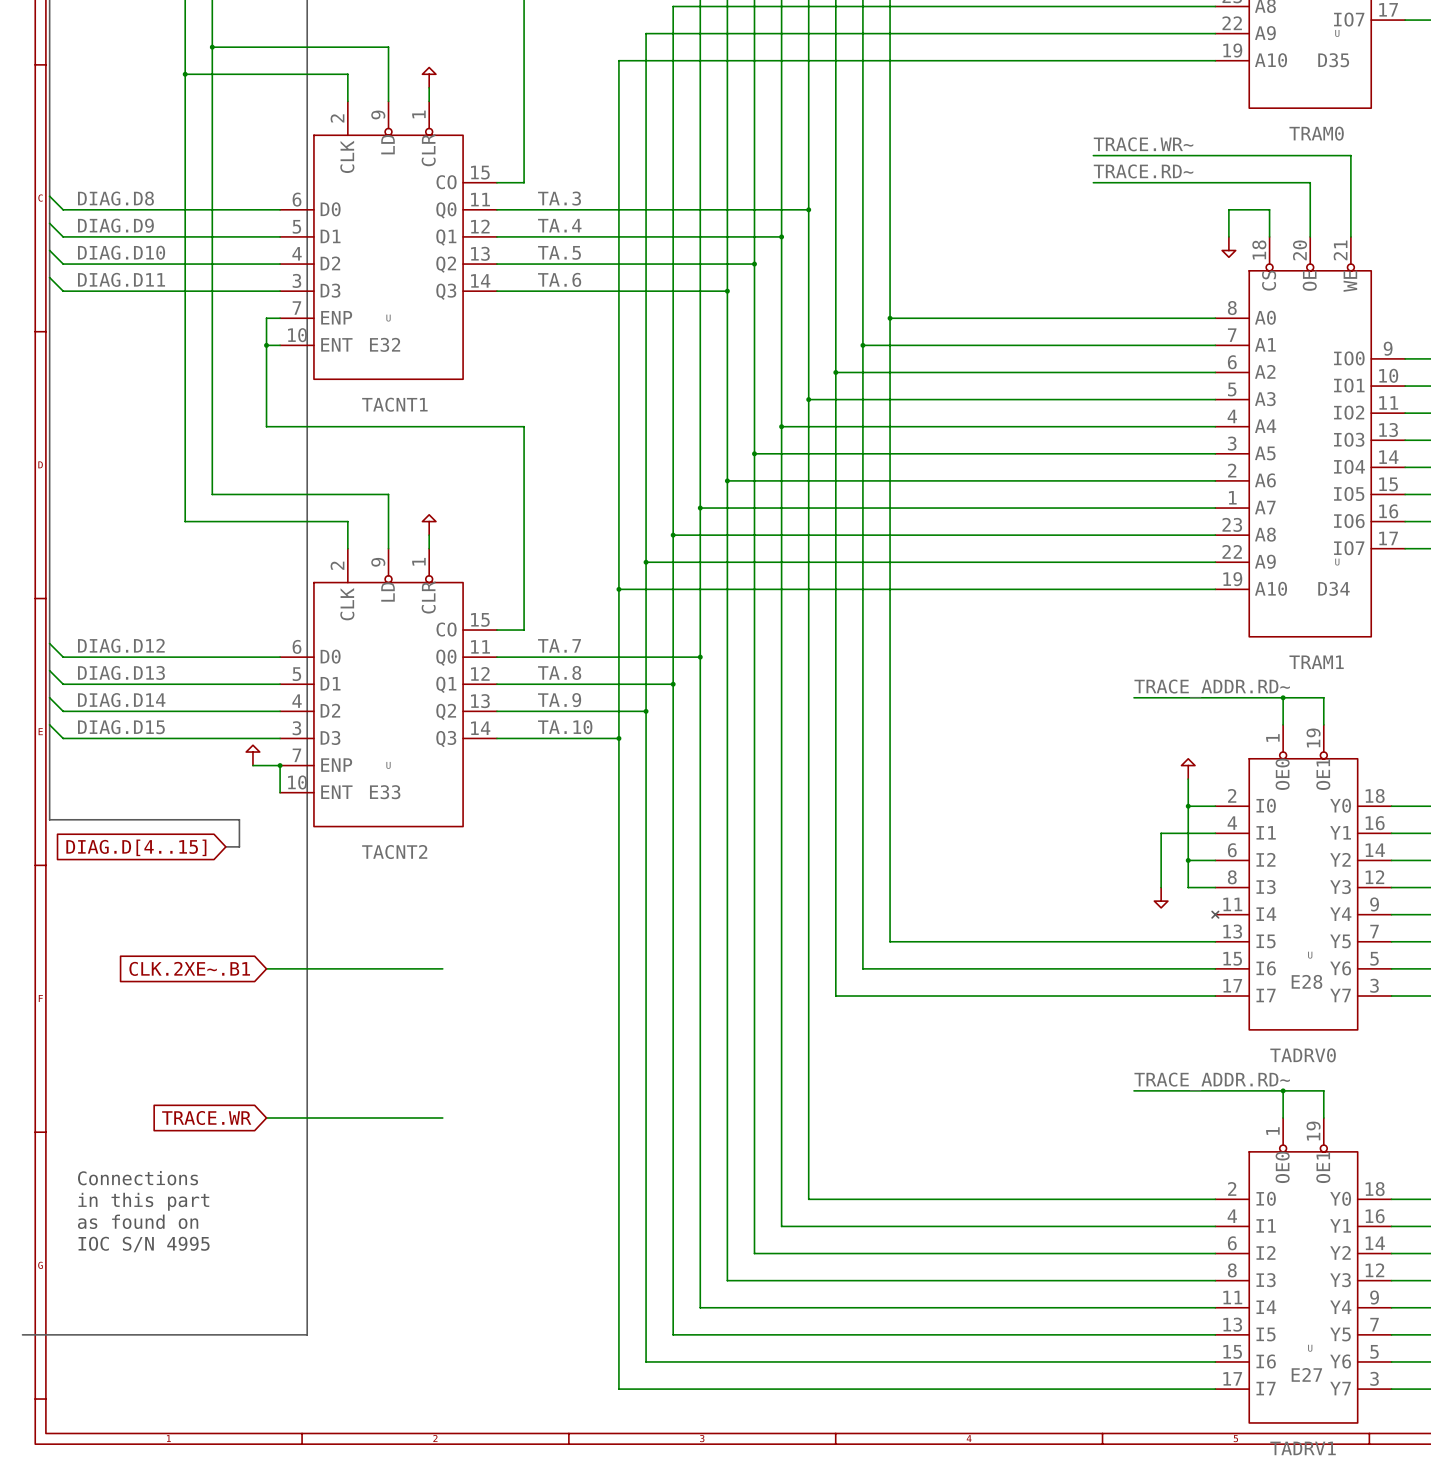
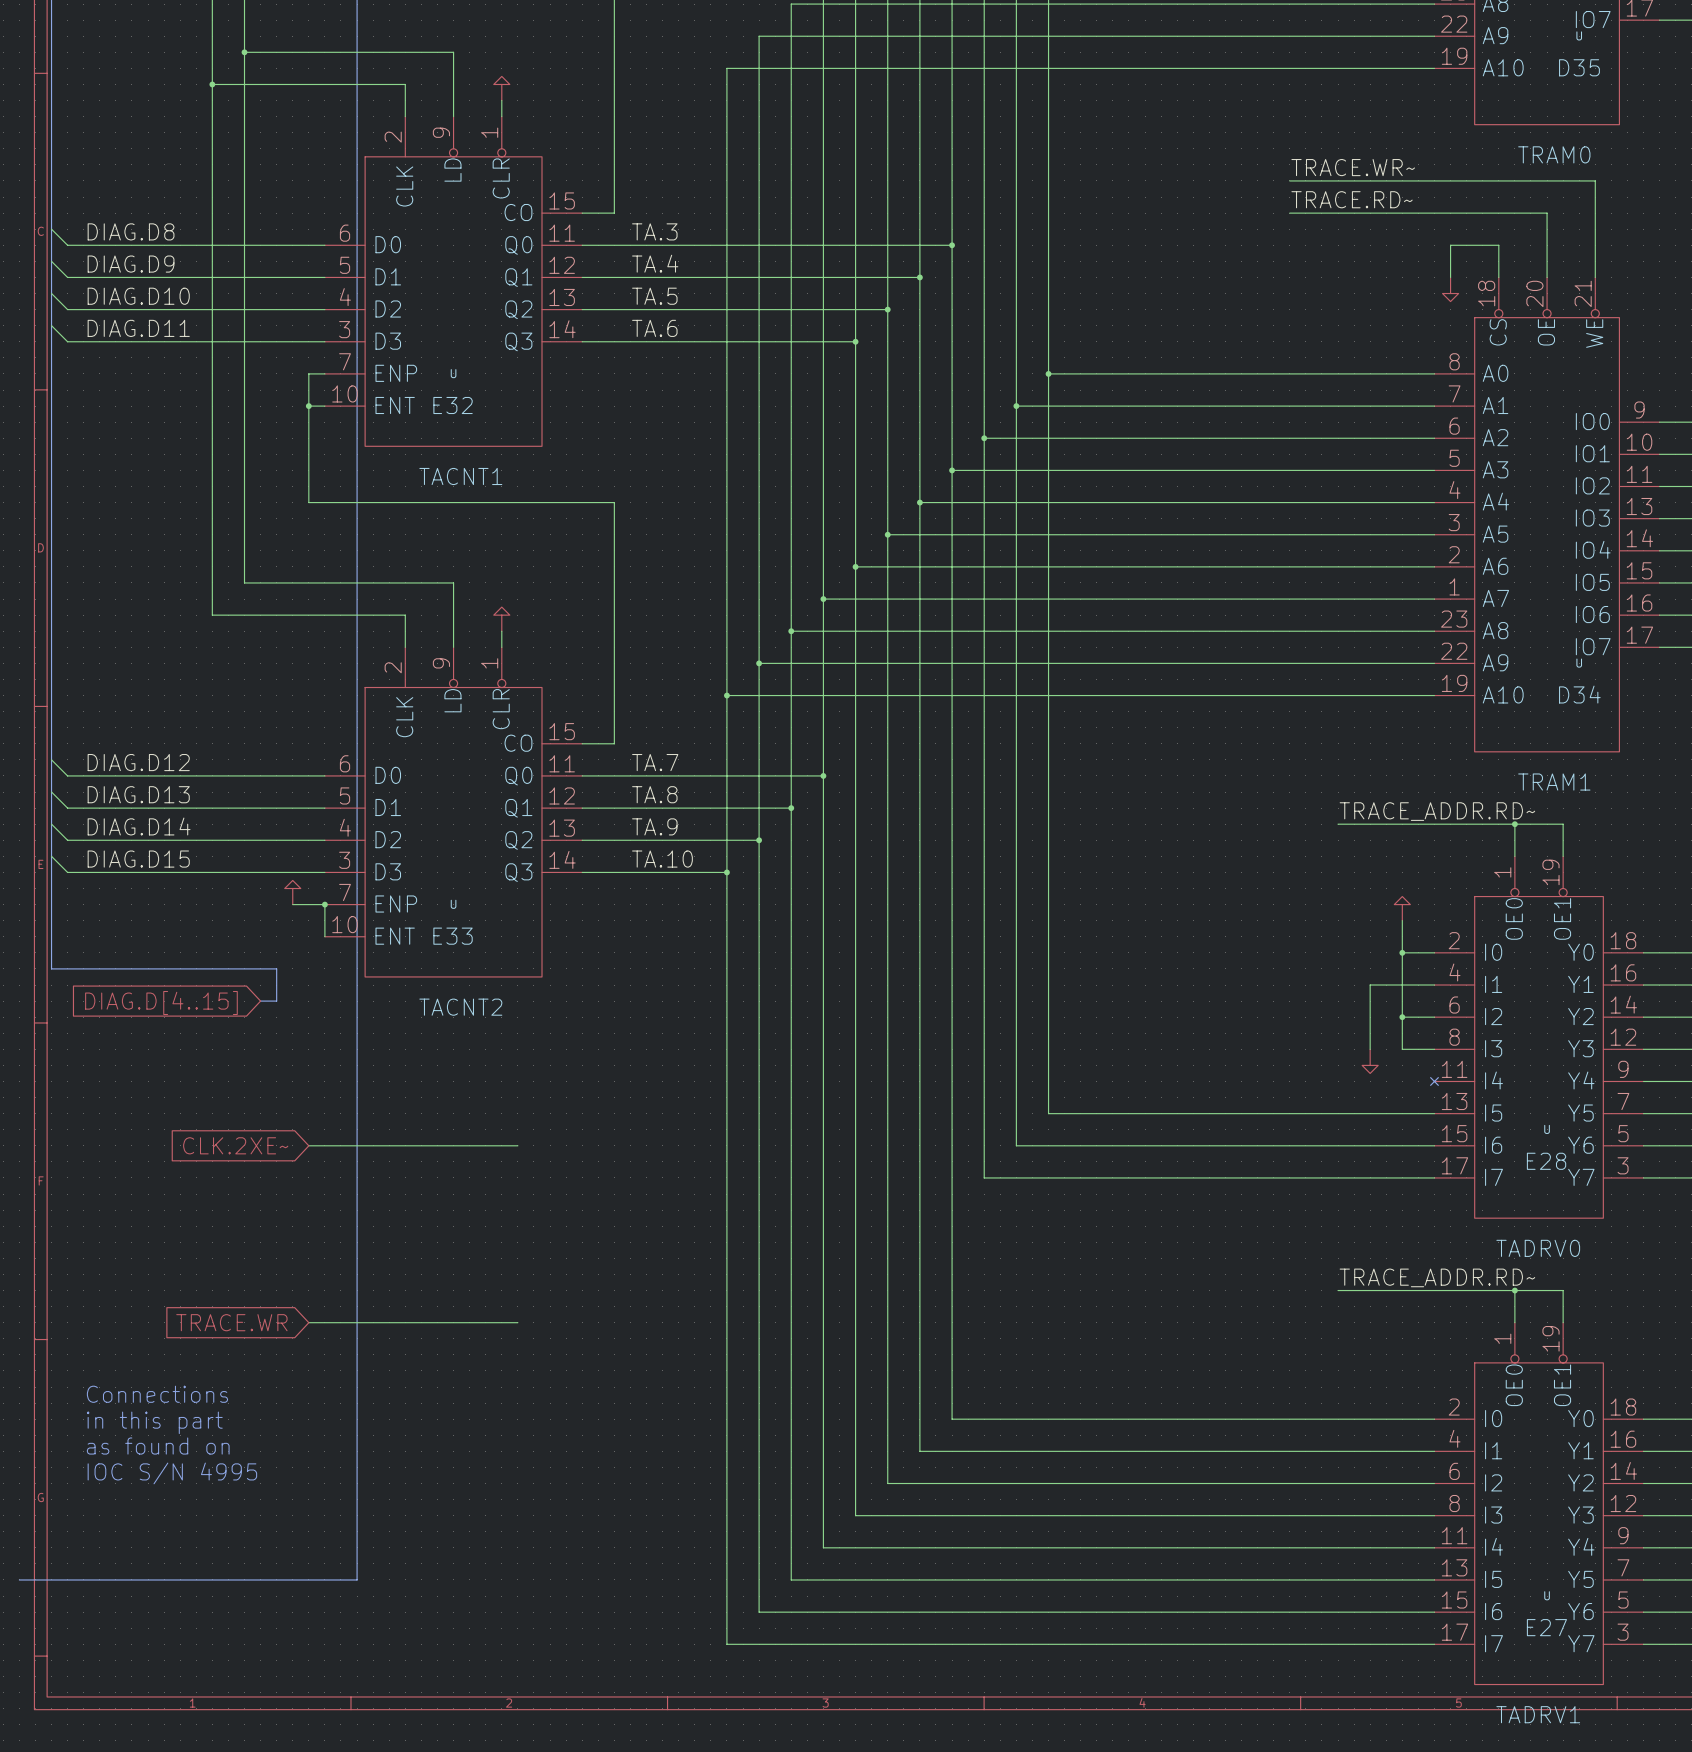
global label: CLK.2XE~.B1 (189, 968) -> CLK.2XE~ (235, 1145)

